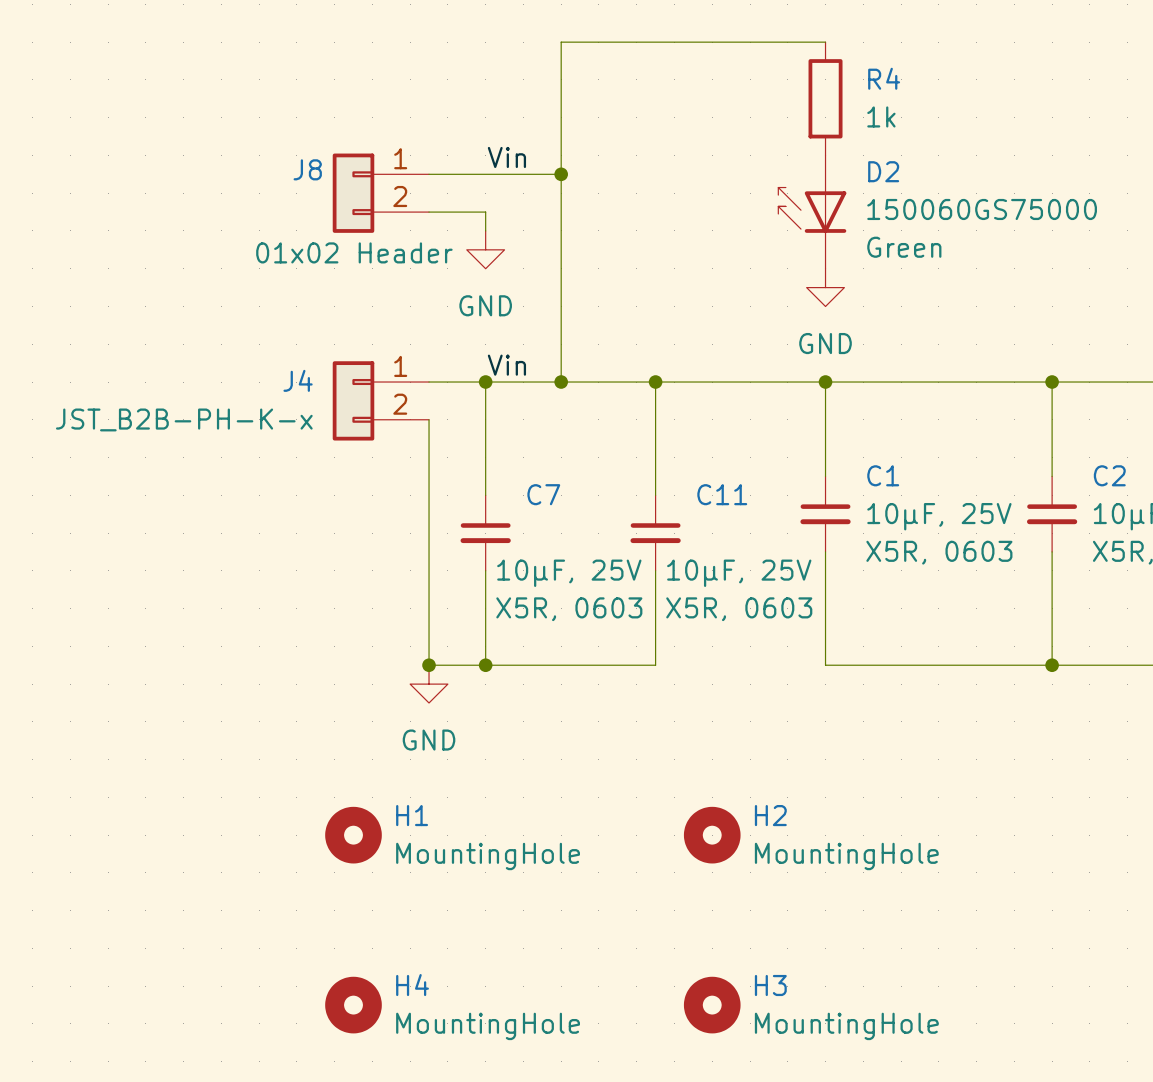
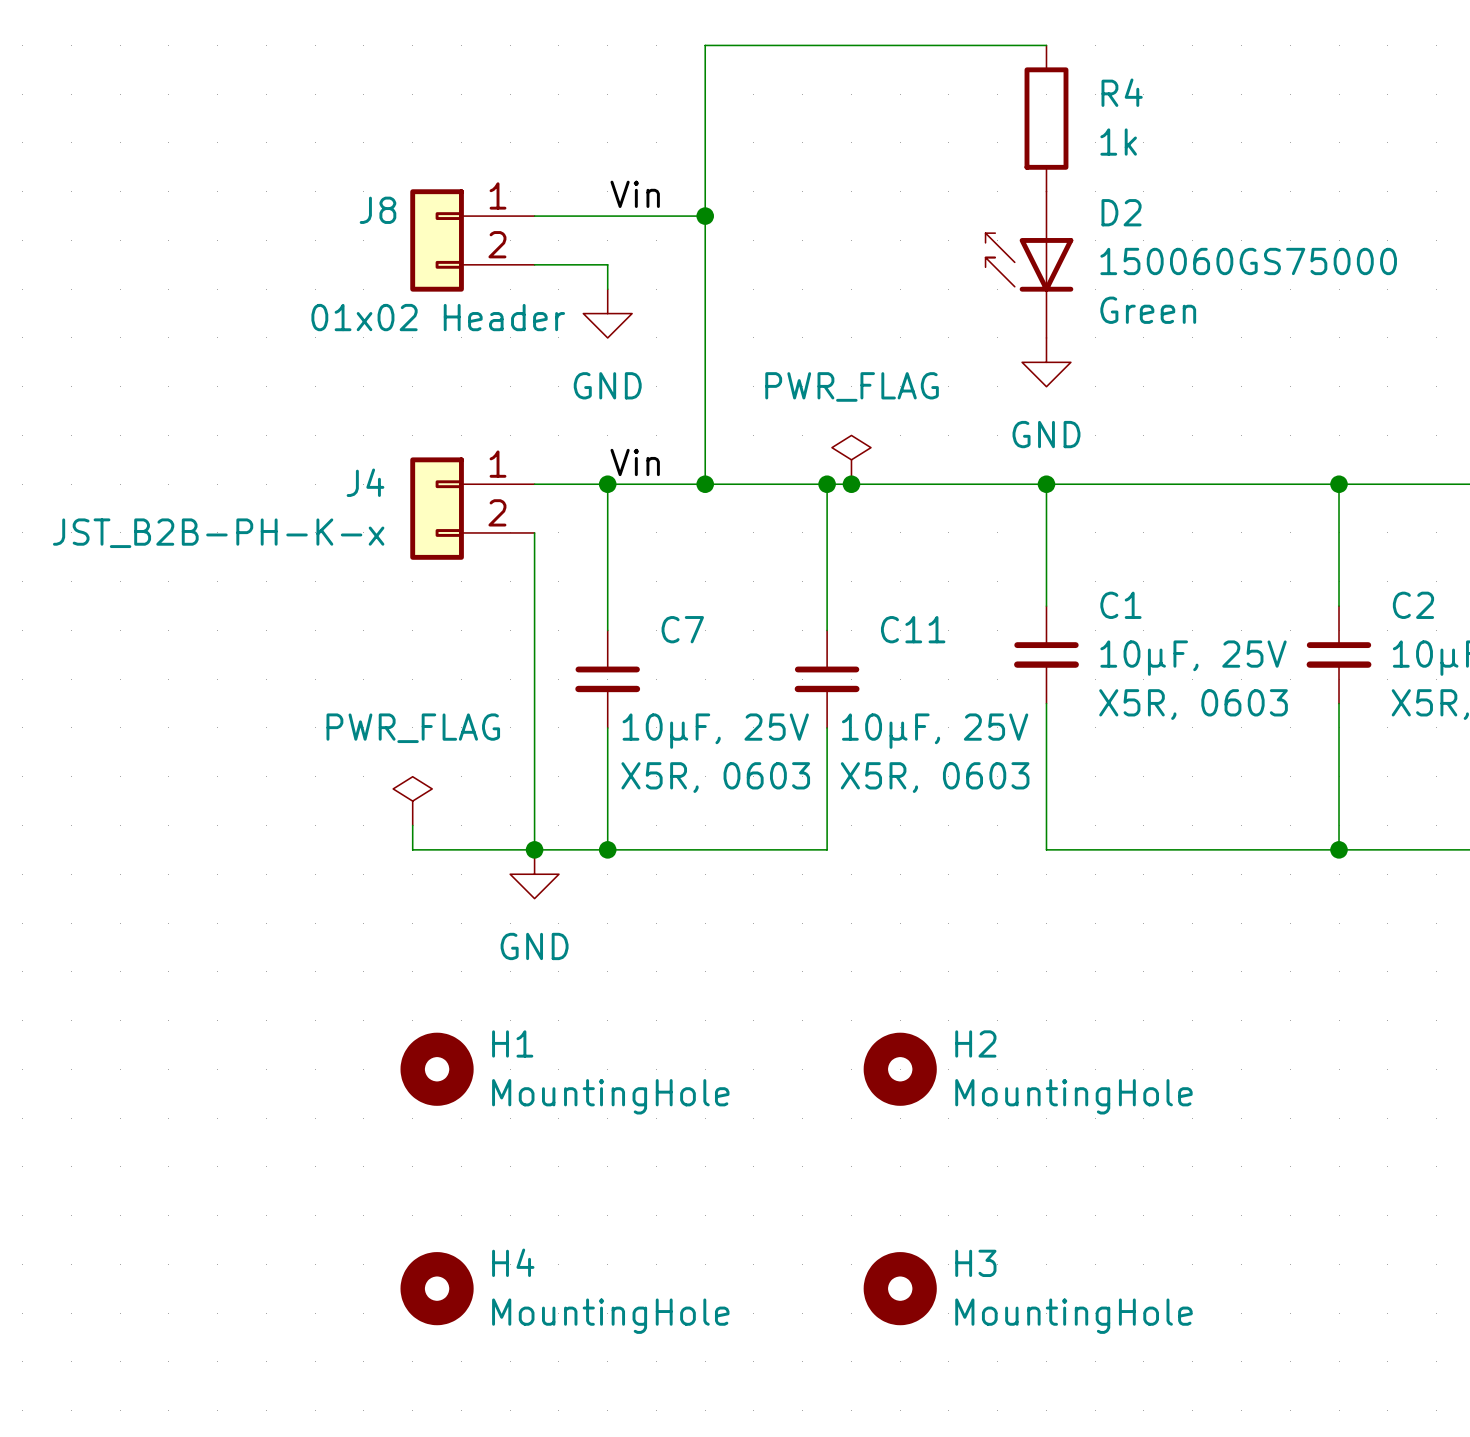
power symbol: none -> PWR_FLAG (851, 459)
junction: none -> (851, 484)
power symbol: none -> PWR_FLAG (412, 801)
wire: none -> (412, 825) (412, 849) (534, 849)

